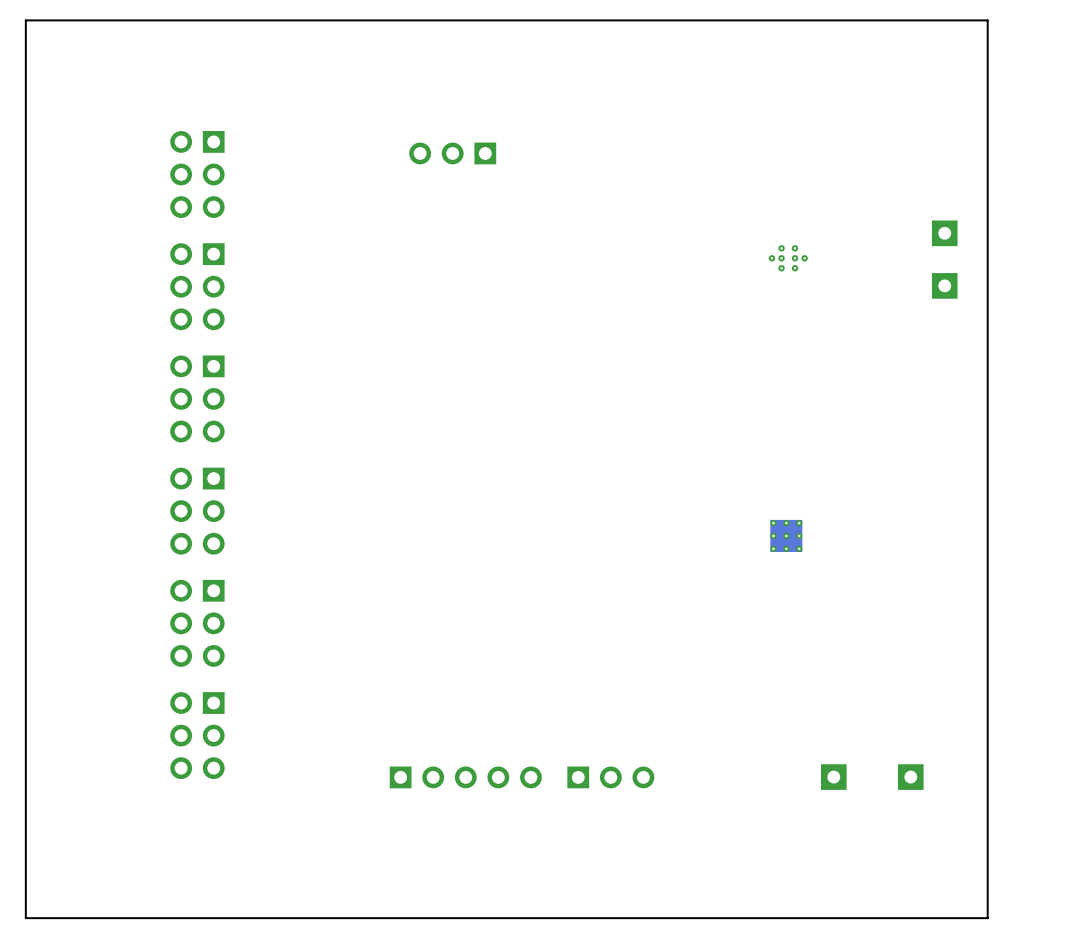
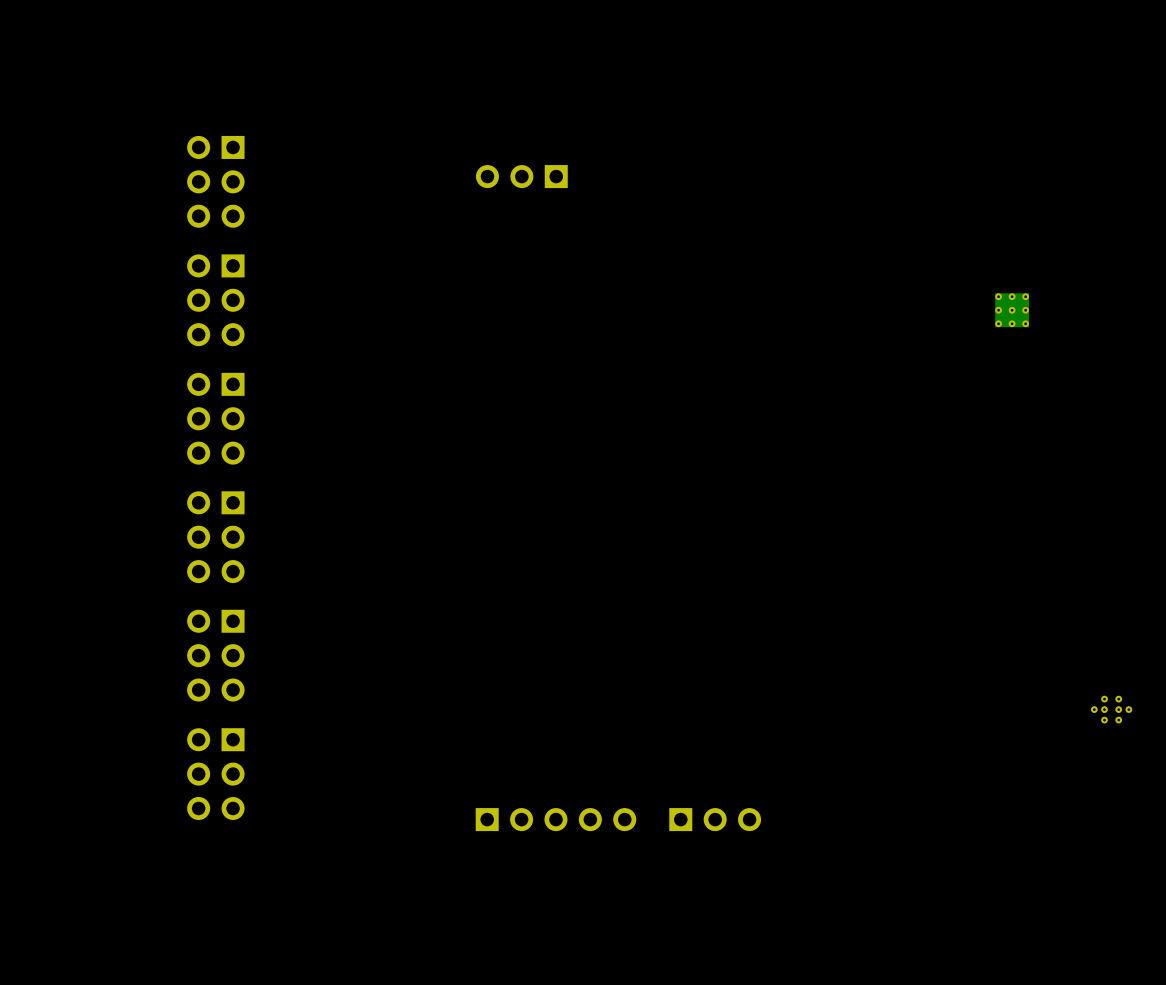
board edge: (987, 20) (25, 20) (25, 918) (987, 918) (987, 20) -> none
part position: (452, 153) -> (521, 176)
part: (944, 233) -> none
part: (788, 258) -> none
part footprint: [931, 273, 958, 299] -> [995, 293, 1030, 328]
part: (786, 535) -> none
part: none -> (1111, 709)
part position: (465, 777) -> (555, 819)
part position: (610, 777) -> (715, 819)
part: (833, 777) -> none
part: (910, 777) -> none

